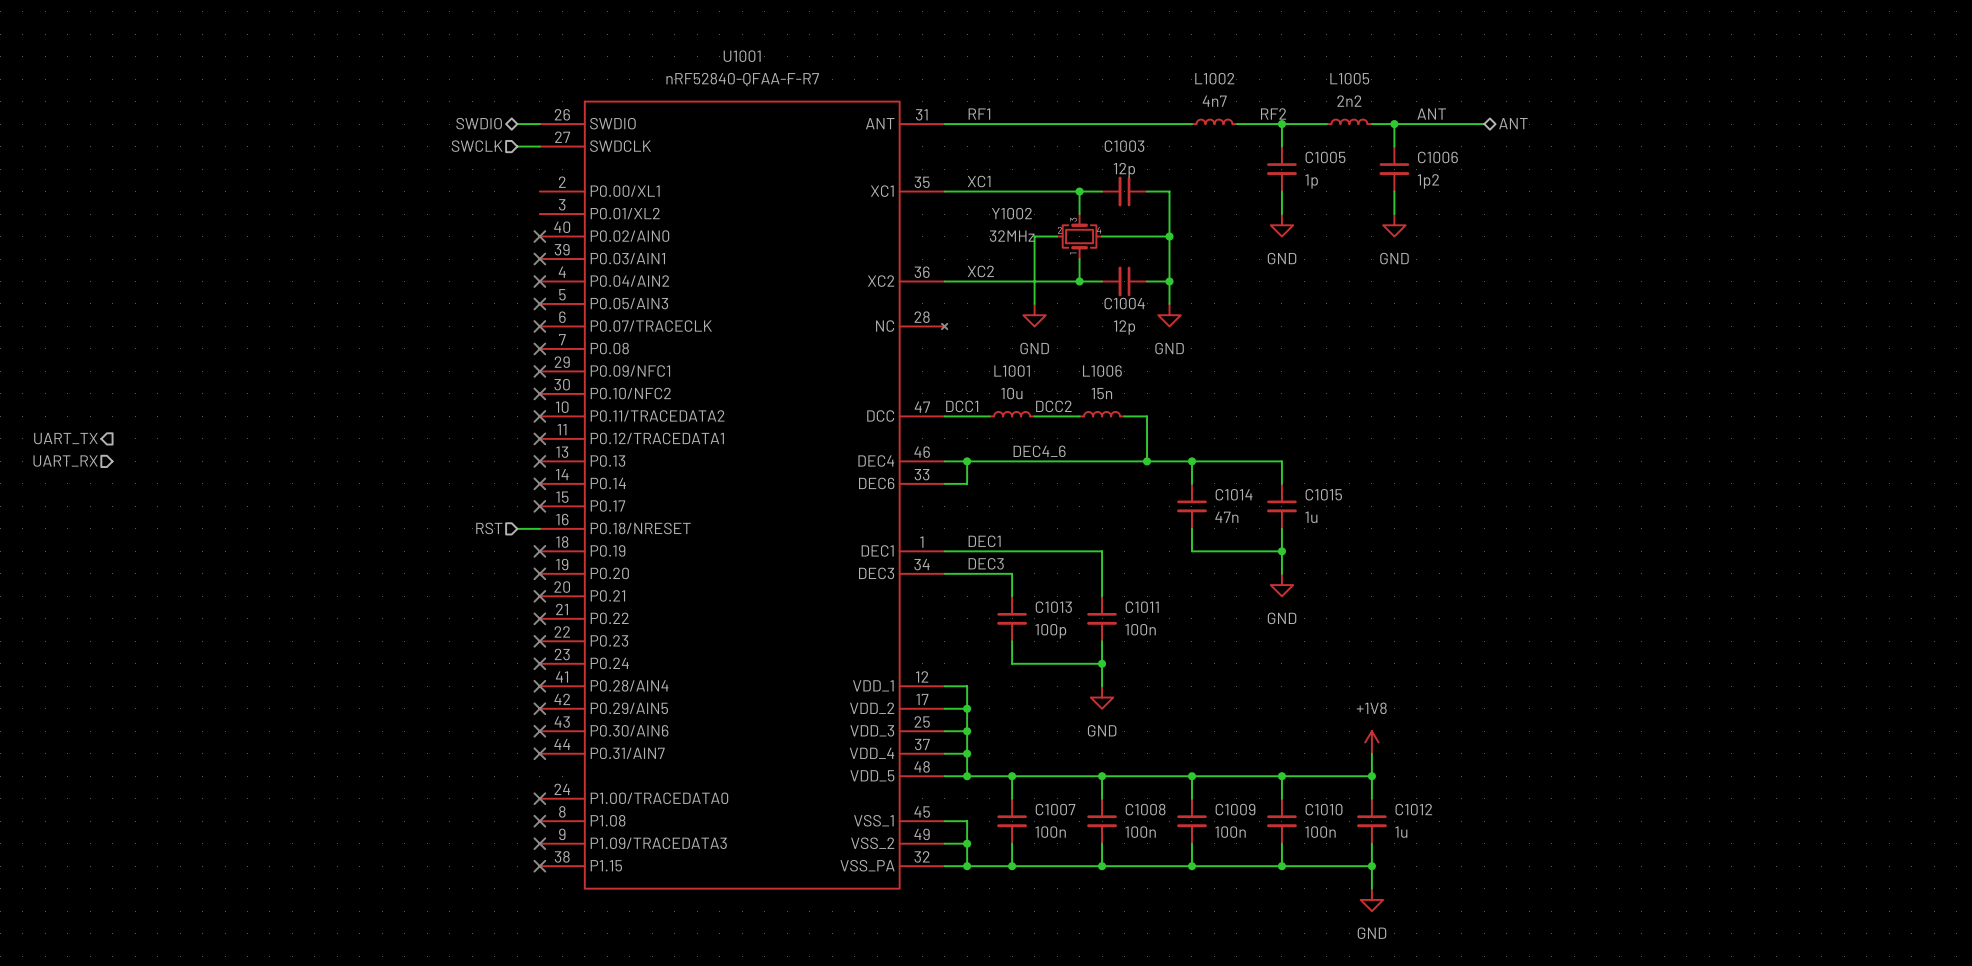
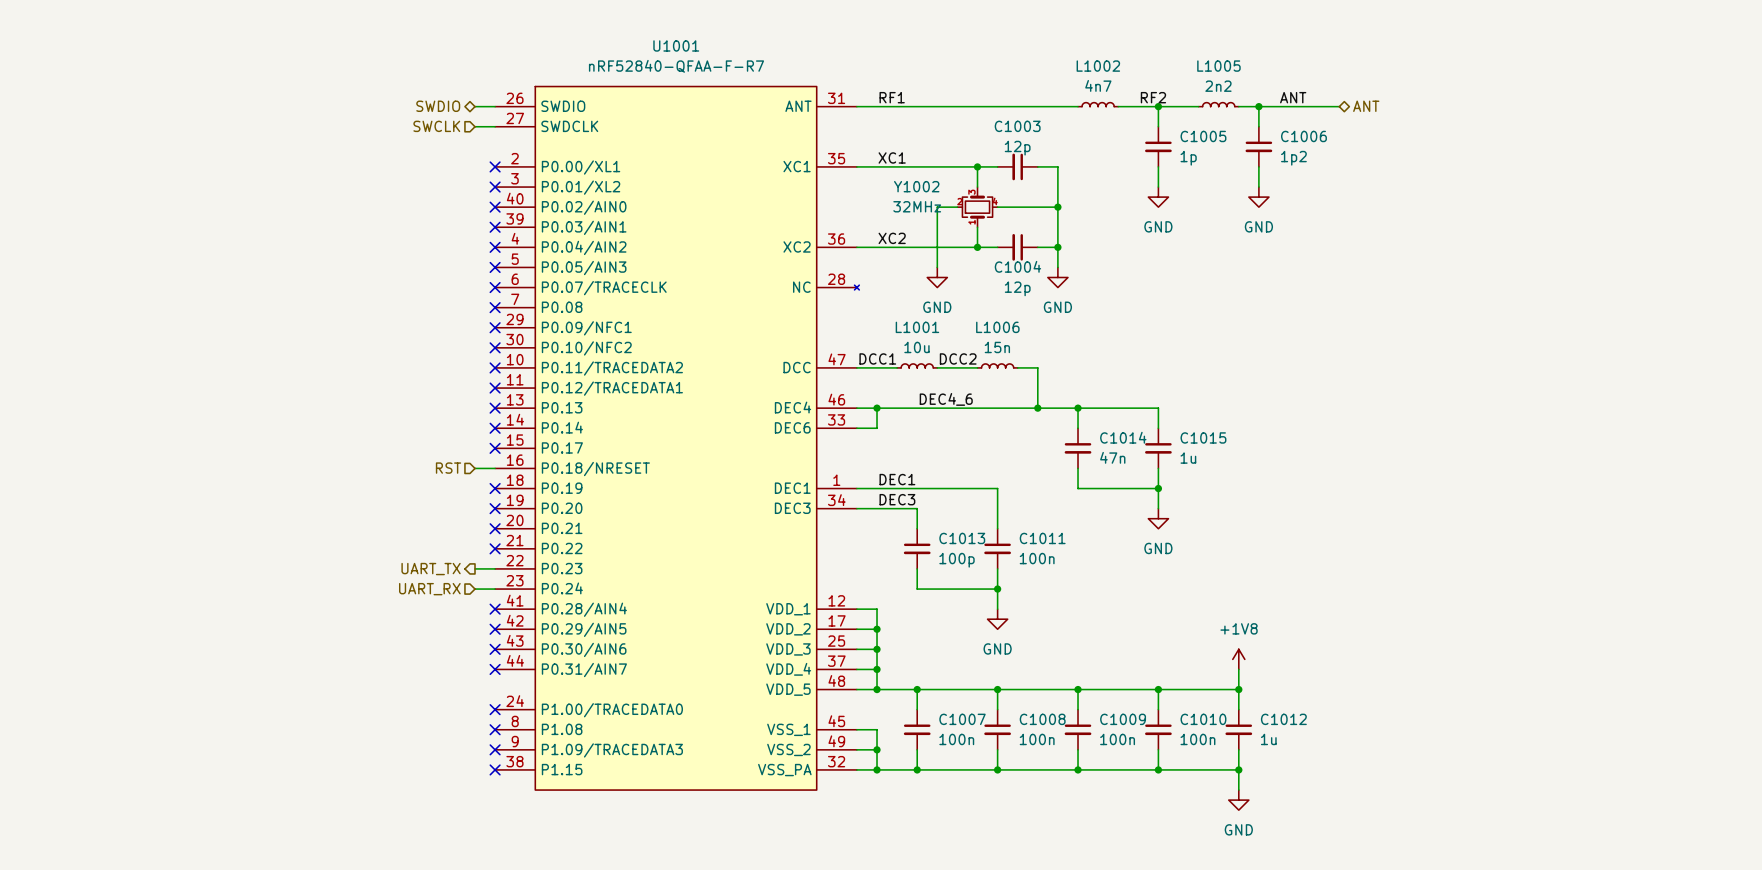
no-connect mark: none -> (495, 166)
no-connect mark: none -> (495, 187)
hierarchical label: UART_TX (65, 438) -> none
hierarchical label: UART_RX (65, 461) -> none
hierarchical label: none -> UART_TX (431, 569)
wire: none -> (475, 568) (495, 568)
no-connect mark: (539, 641) -> none
hierarchical label: none -> UART_RX (429, 589)
wire: none -> (475, 589) (495, 589)
no-connect mark: (539, 663) -> none

